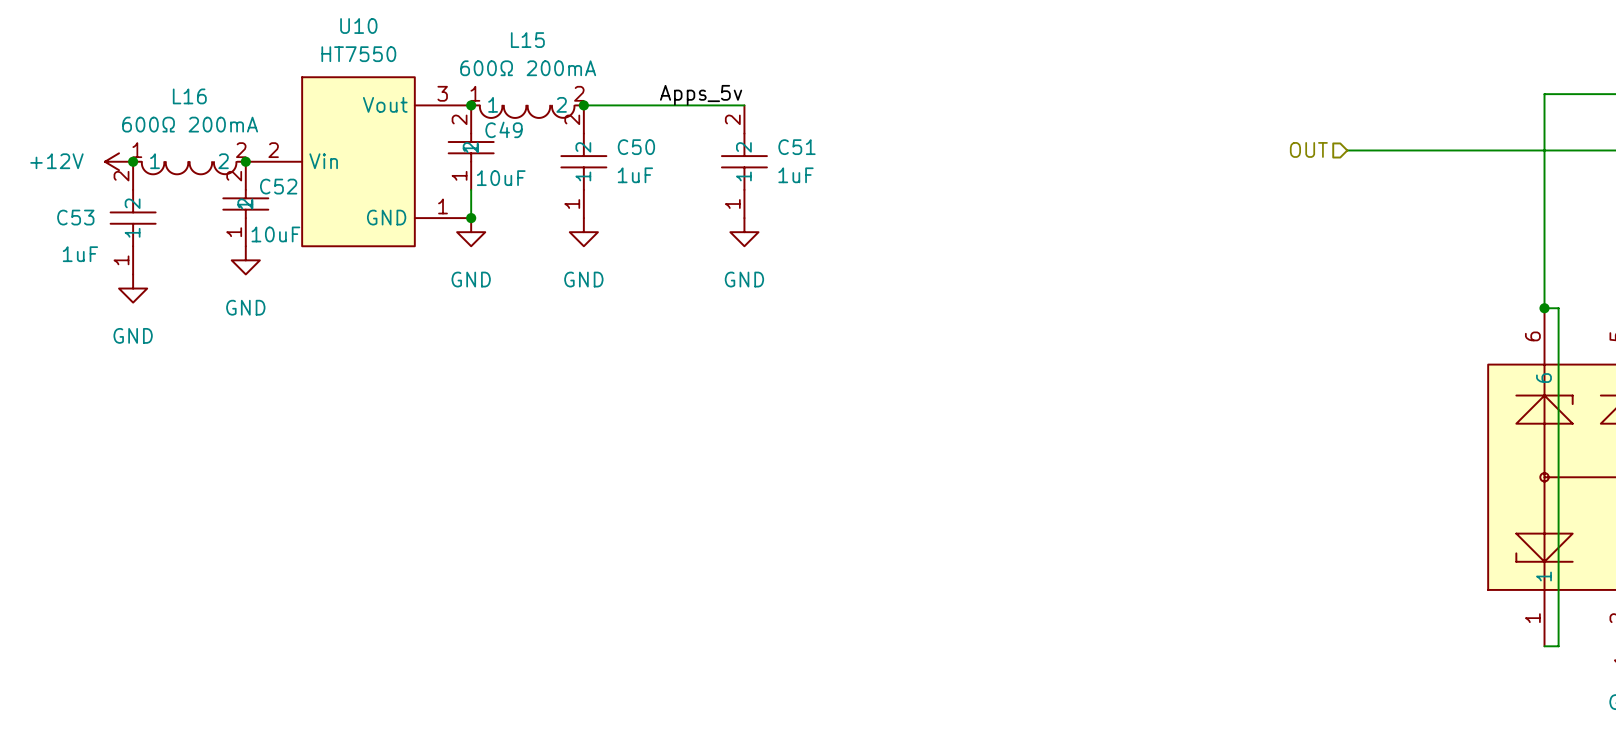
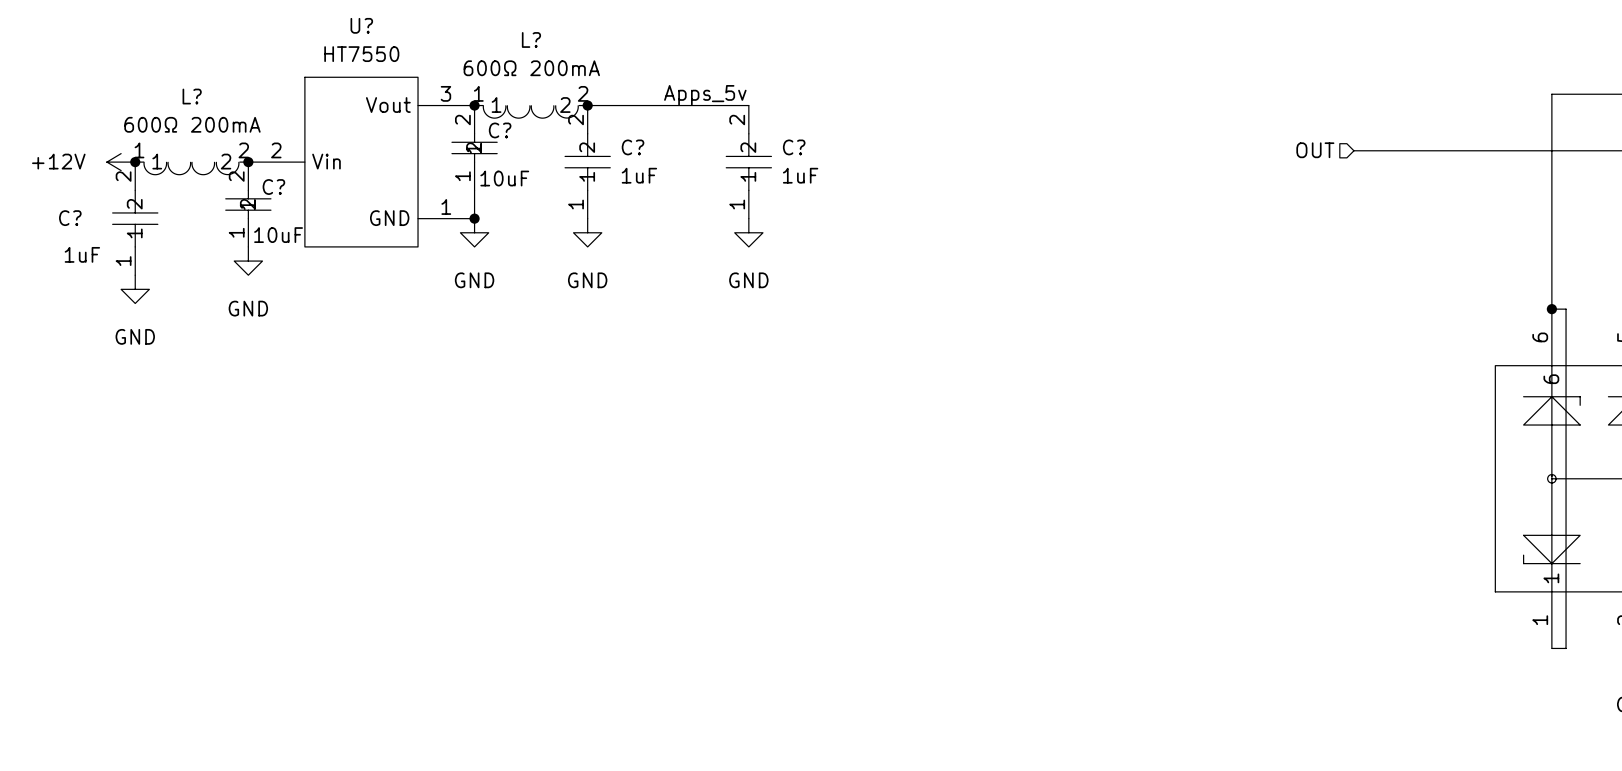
U10 name: U10 (358, 26) -> U? (361, 25)
L15 name: L15 (527, 40) -> L? (531, 39)
L16 name: L16 (189, 96) -> L? (192, 96)
C49 name: C49 (504, 129) -> C? (500, 130)
C50 name: C50 (636, 147) -> C? (633, 147)
C51 name: C51 (796, 147) -> C? (794, 147)
C52 name: C52 (278, 186) -> C? (273, 187)
C53 name: C53 (75, 217) -> C? (70, 218)

